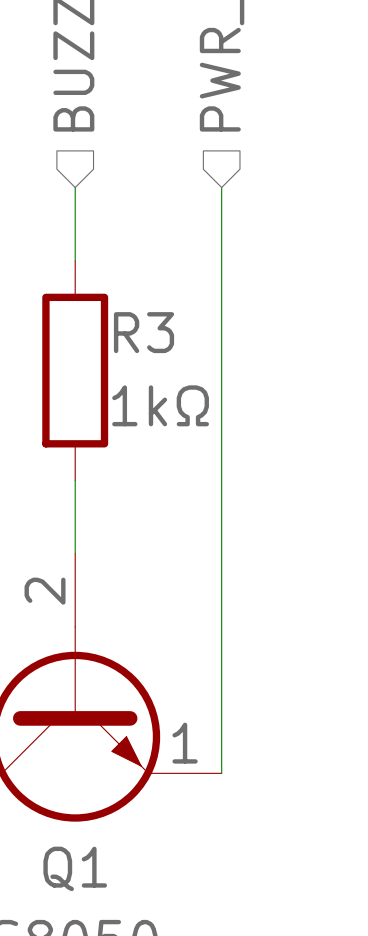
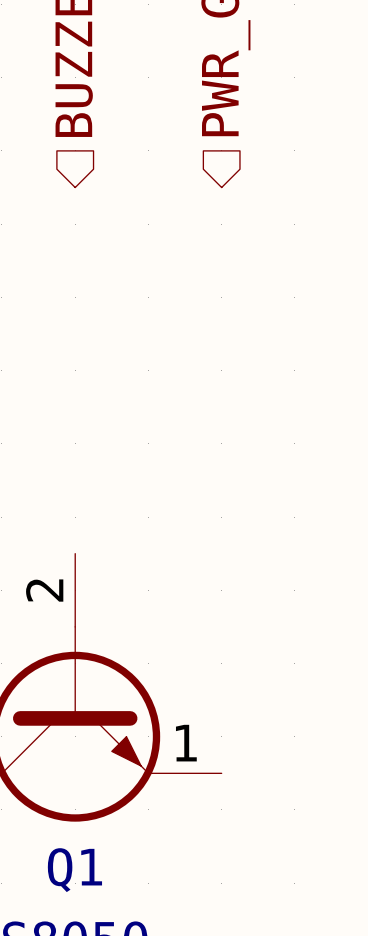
wire: (75, 187) (75, 260) -> none
wire: (221, 187) (221, 773) -> none
R3: 1kΩ (75, 370) -> none
wire: (75, 480) (75, 553) -> none

